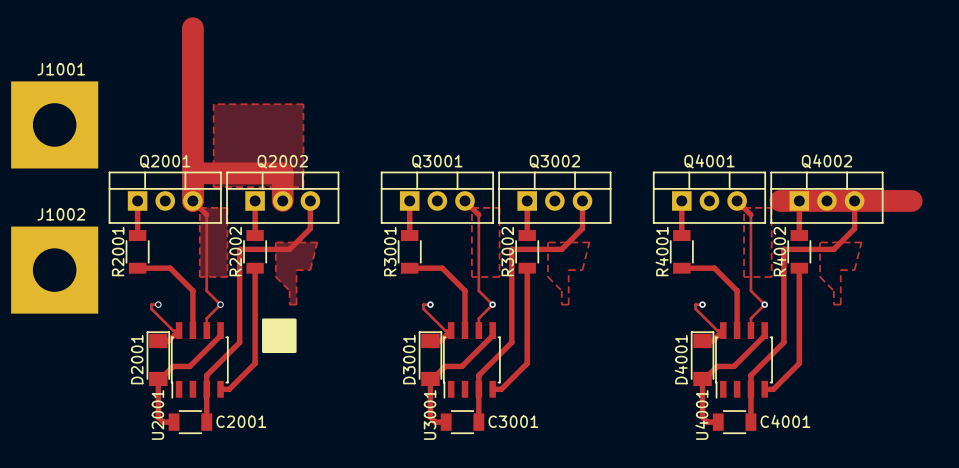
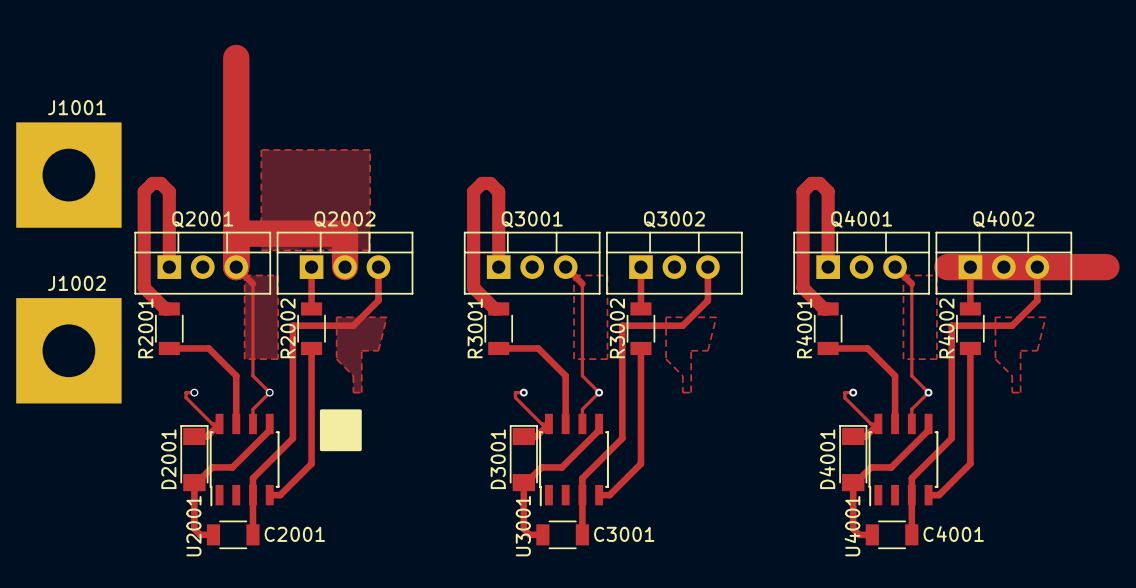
track: (137, 200) (137, 235) -> (169, 267) (169, 191) (160, 183) (152, 183) (144, 191) (144, 287) (165, 308) (169, 308)
track: (409, 200) (409, 235) -> (498, 267) (498, 191) (490, 183) (481, 183) (473, 191) (473, 287) (494, 308) (498, 308)
track: (681, 200) (681, 235) -> (828, 267) (828, 191) (819, 183) (811, 183) (803, 191) (803, 287) (824, 308) (828, 308)

